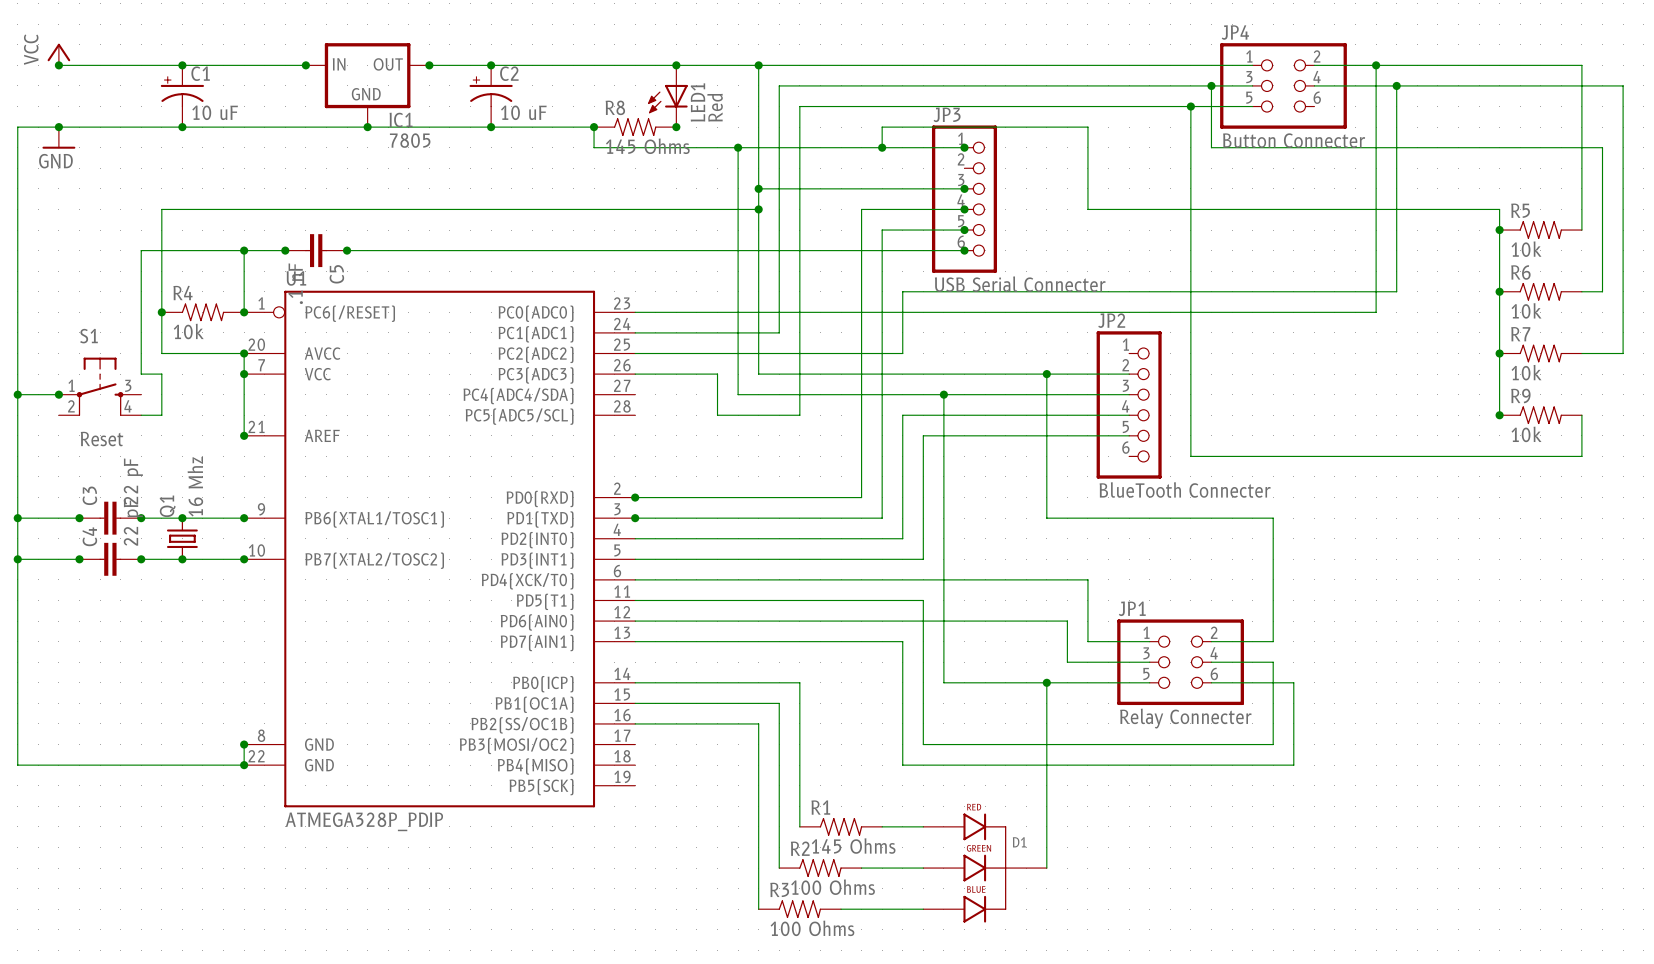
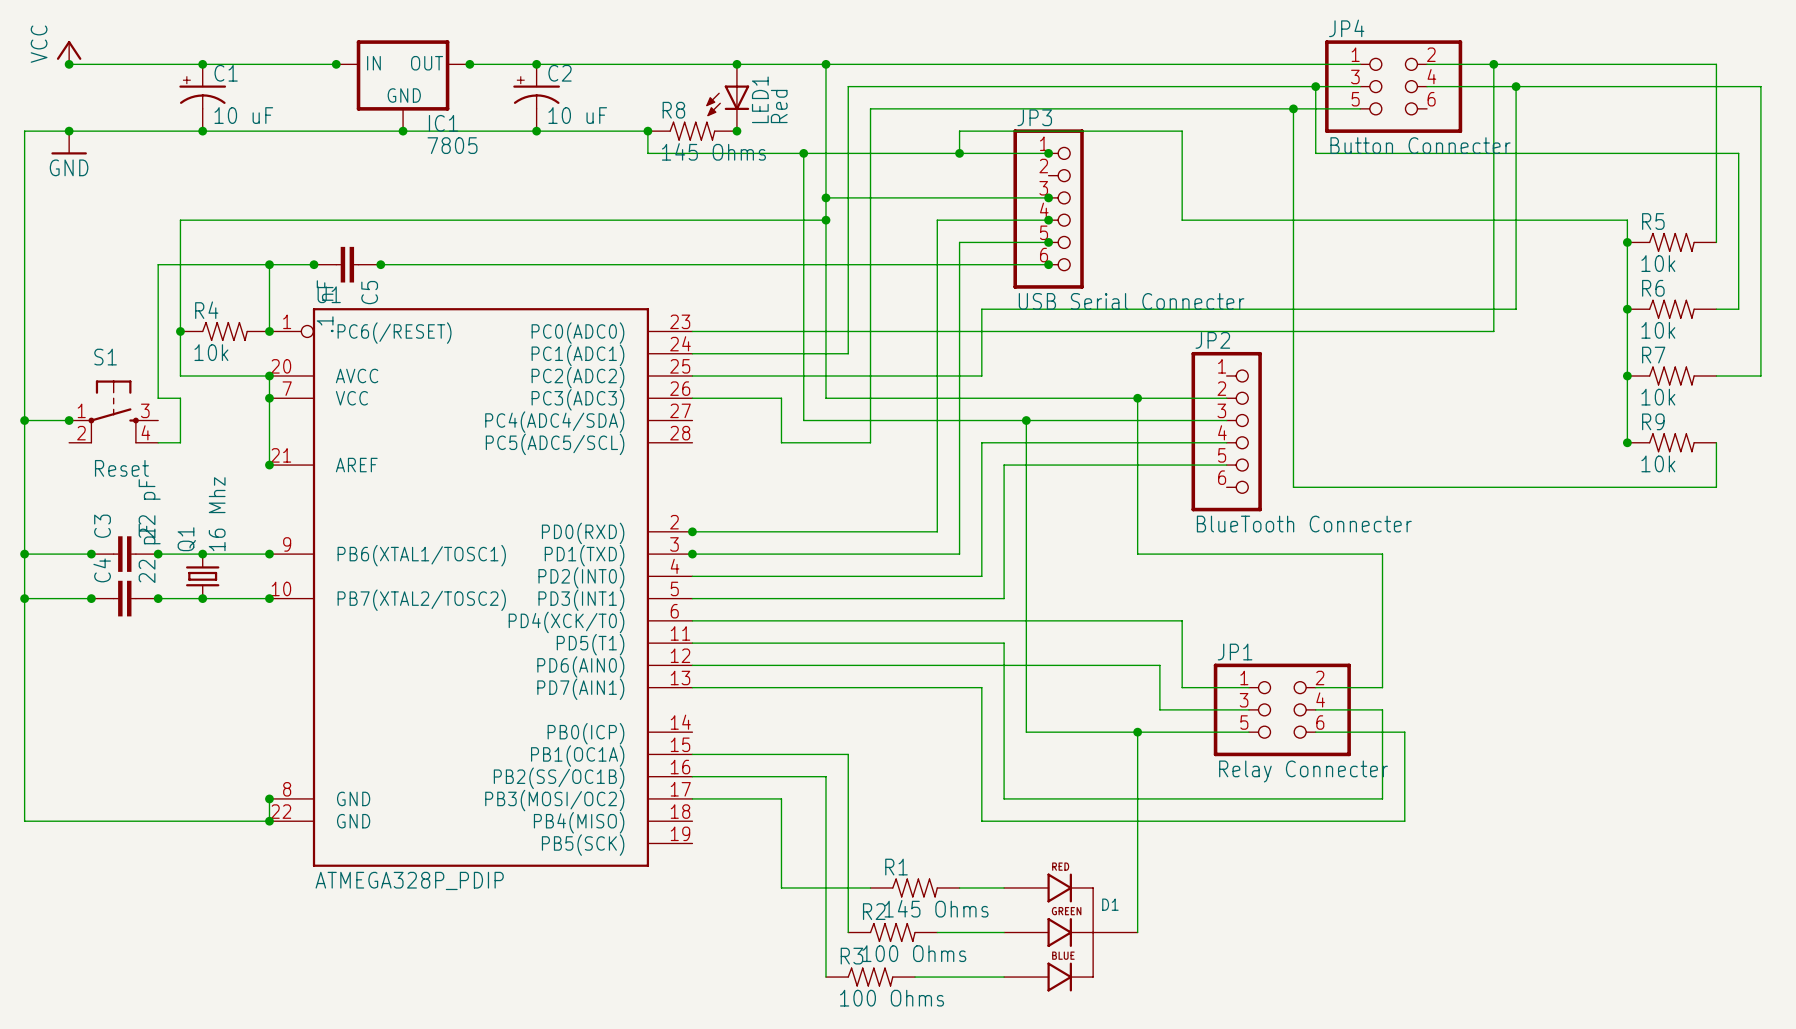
wire: (635, 682) (799, 682) (799, 826) -> (692, 798) (781, 798) (781, 887) (870, 887)

